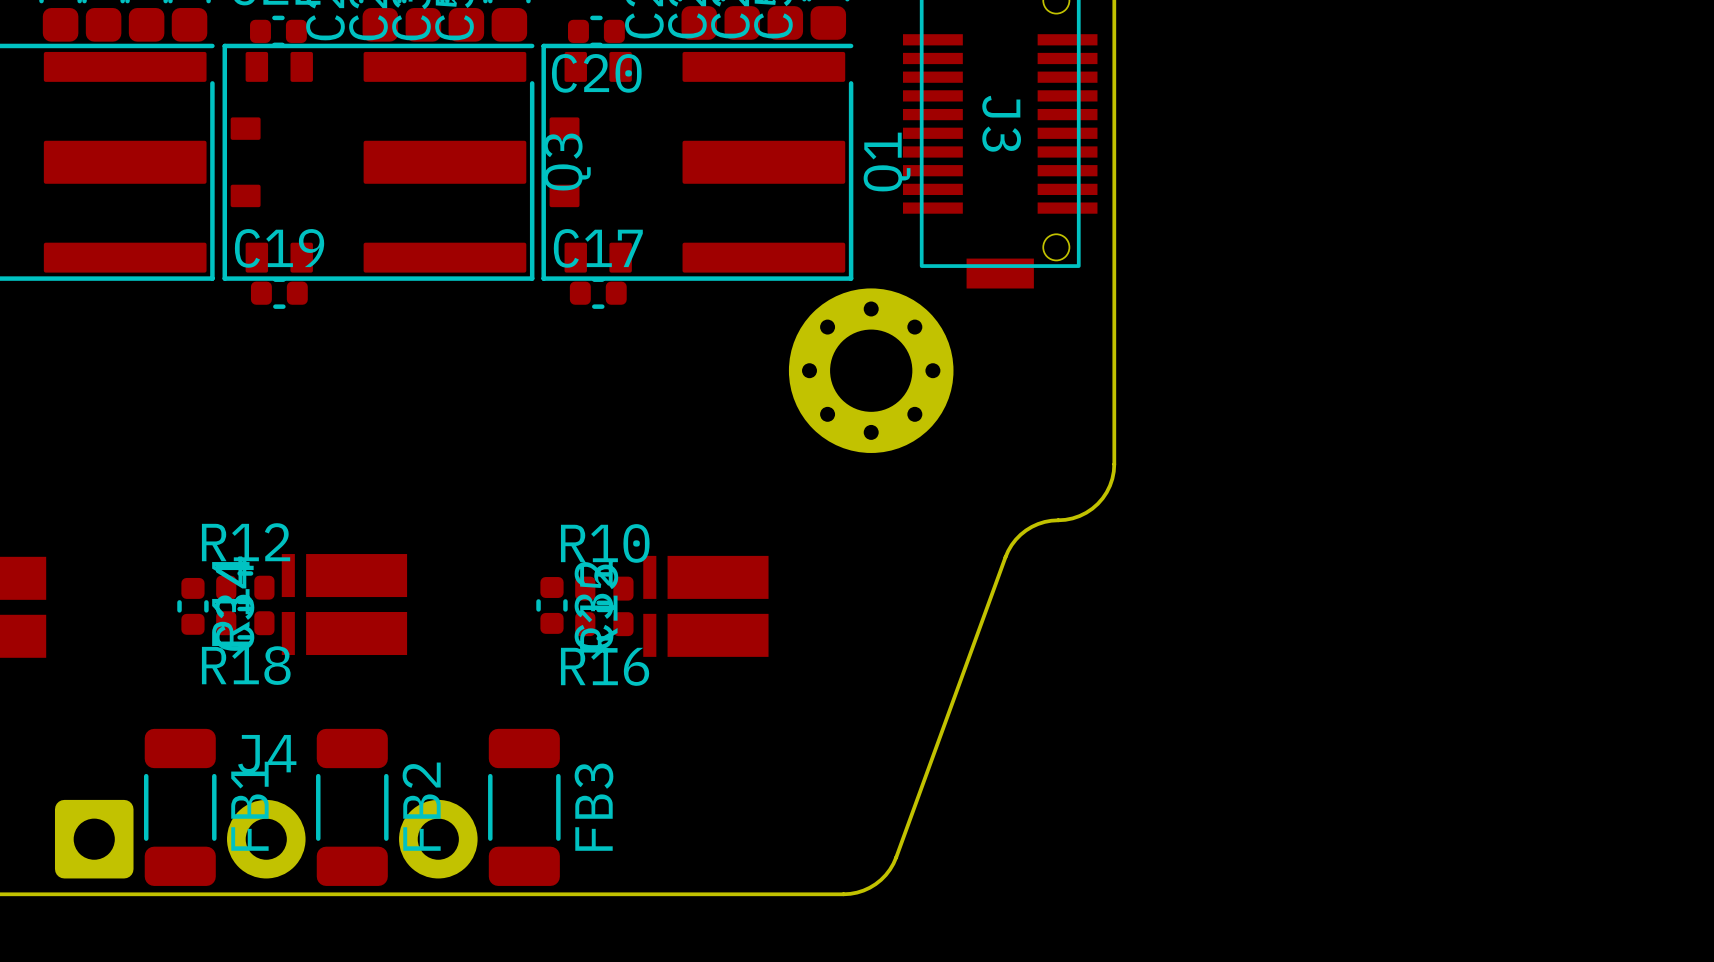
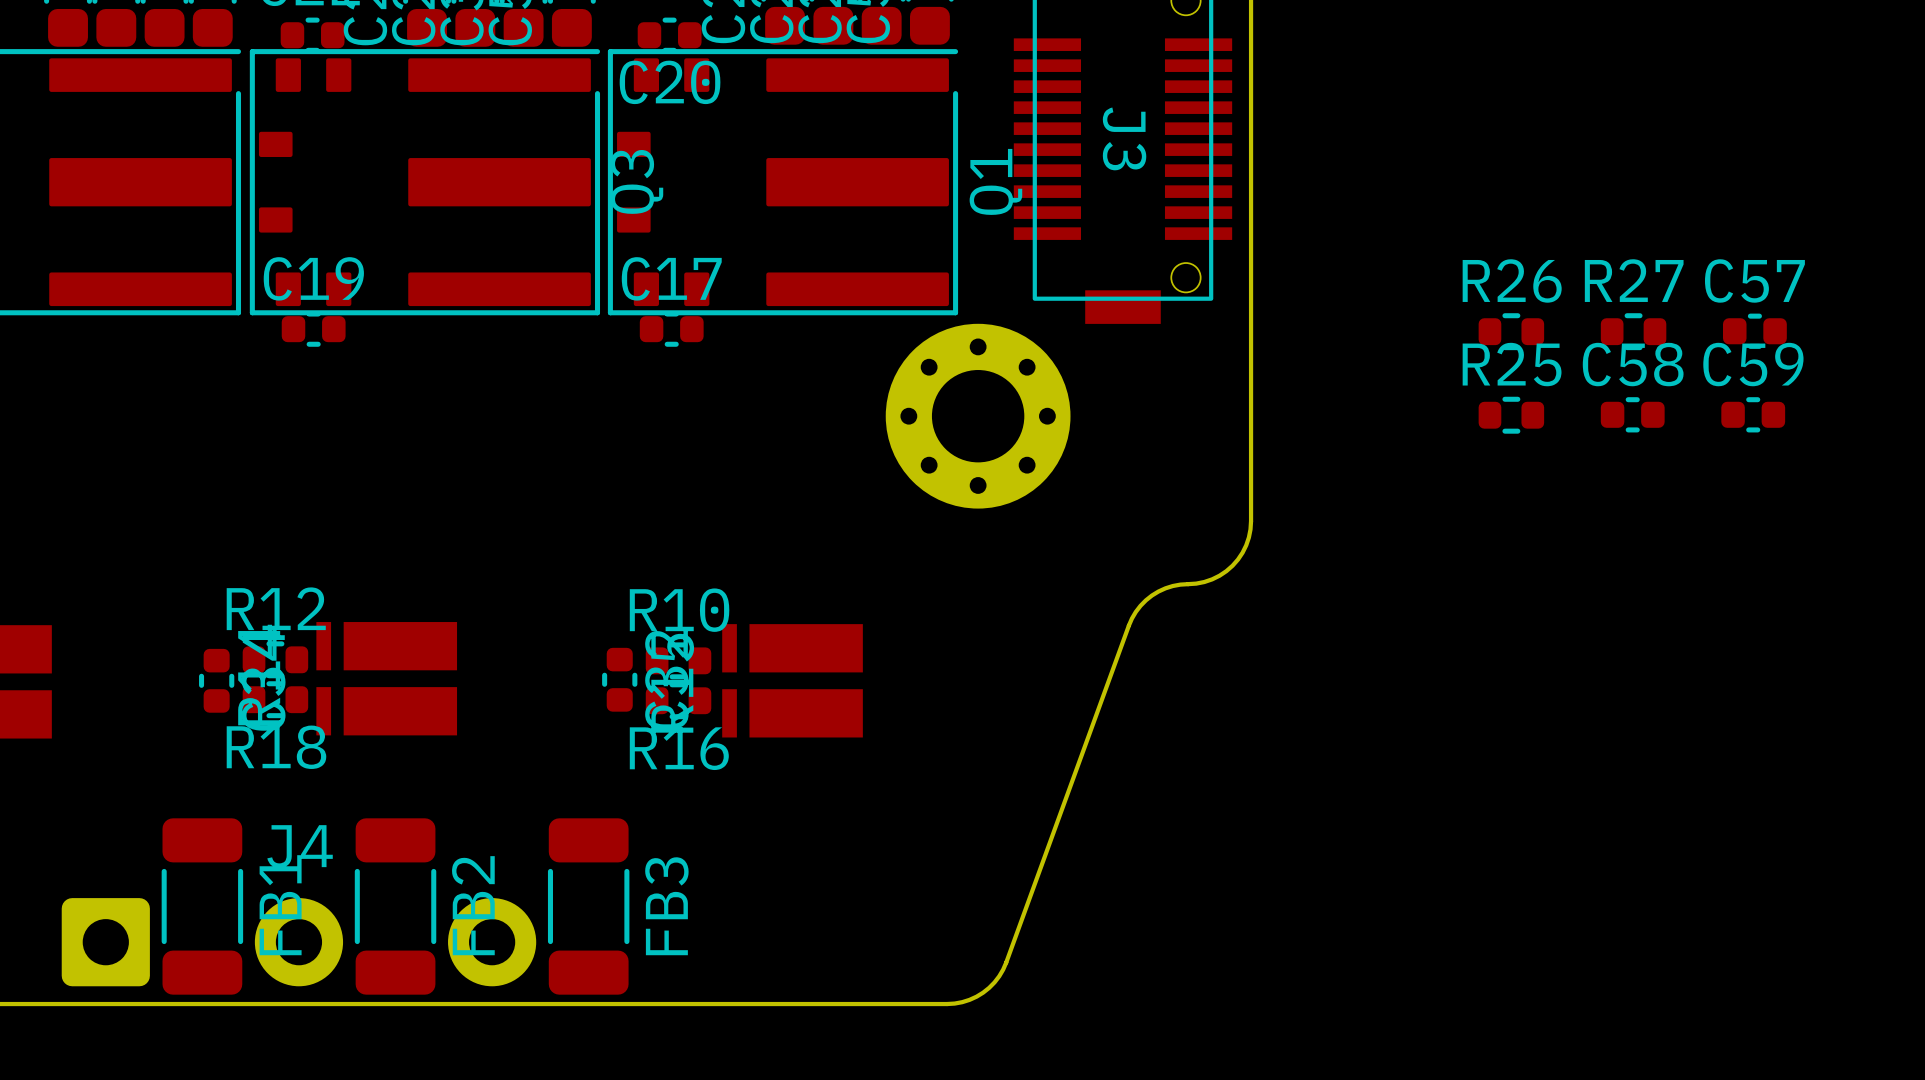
R26: none -> (1511, 331)
R27: none -> (1633, 331)
C57: none -> (1754, 331)
R25: none -> (1511, 415)
C58: none -> (1632, 414)
C59: none -> (1753, 414)

